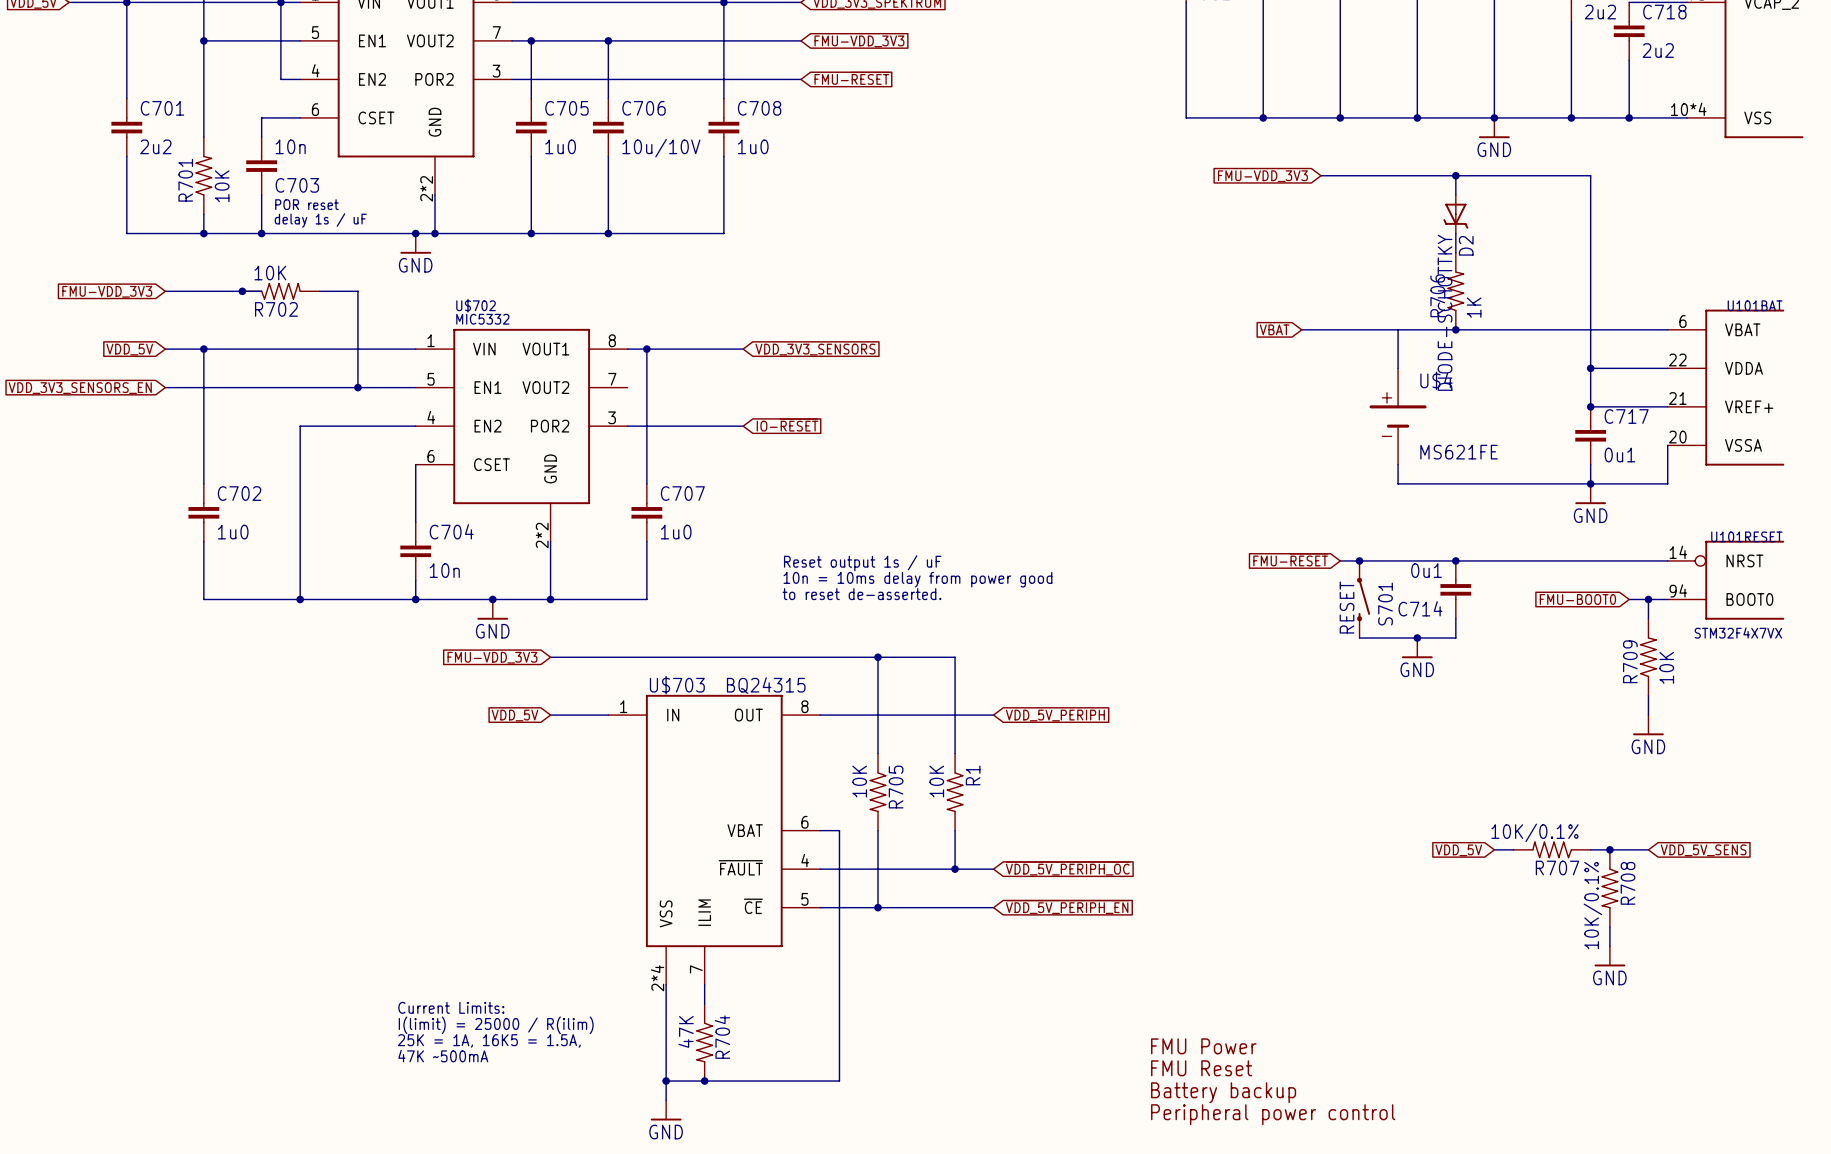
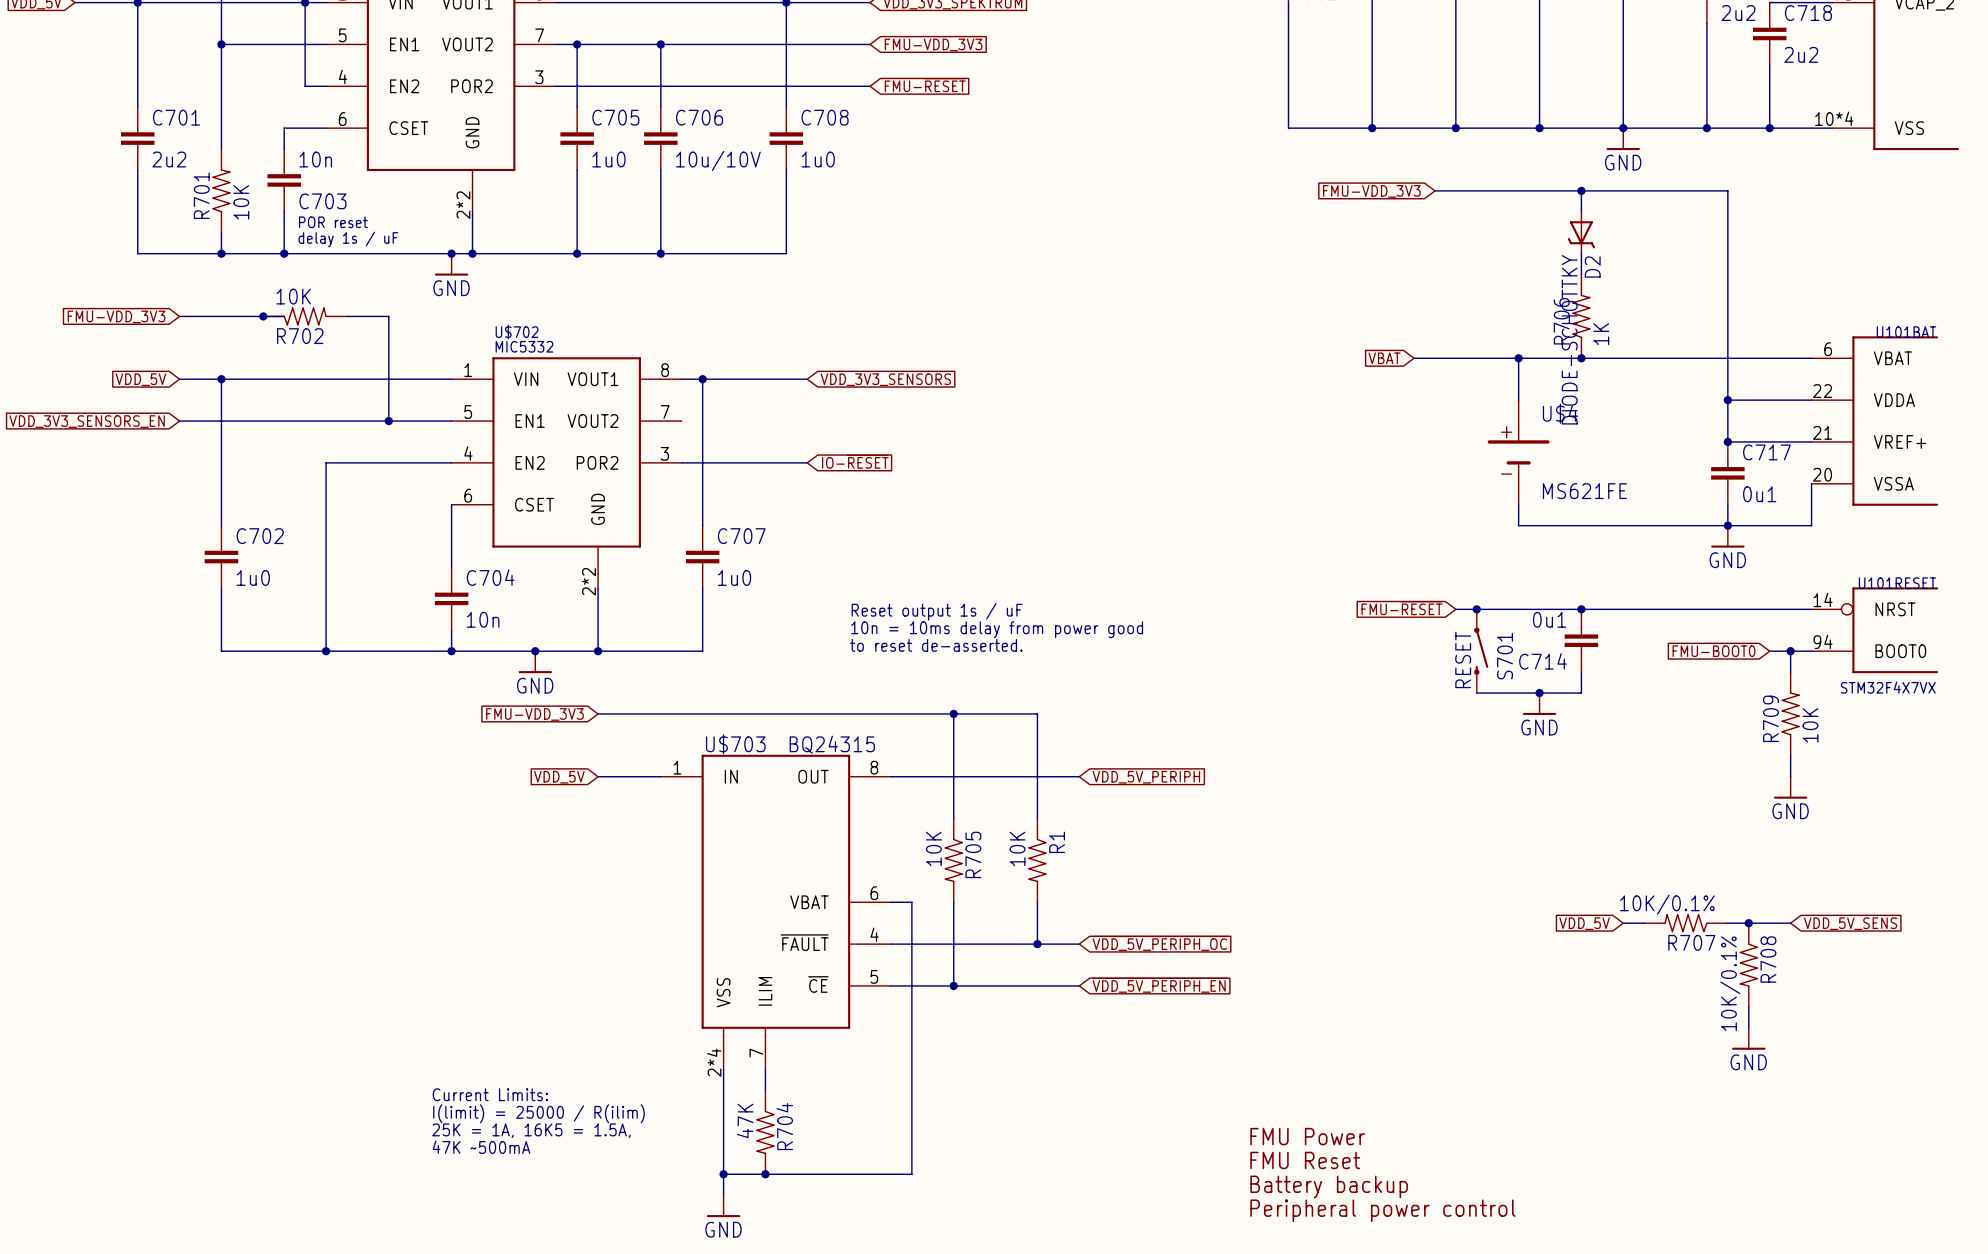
junction: none -> (1518, 358)

